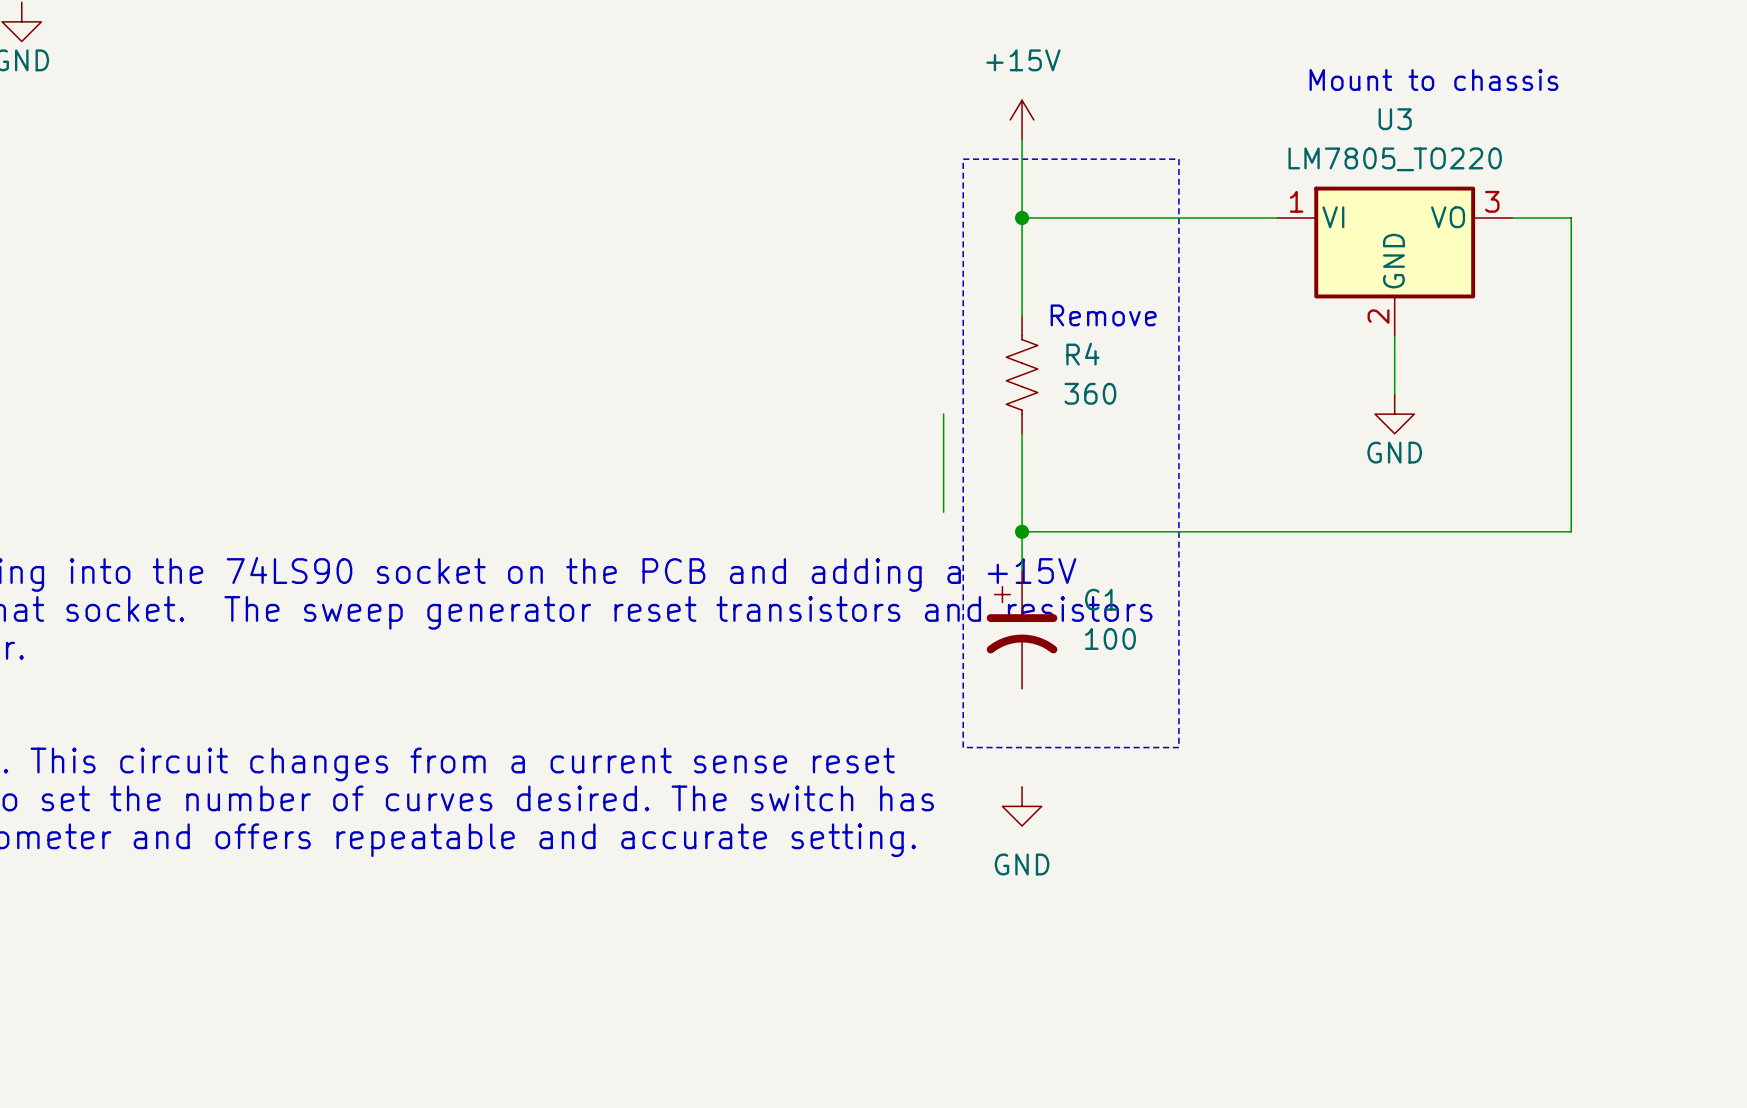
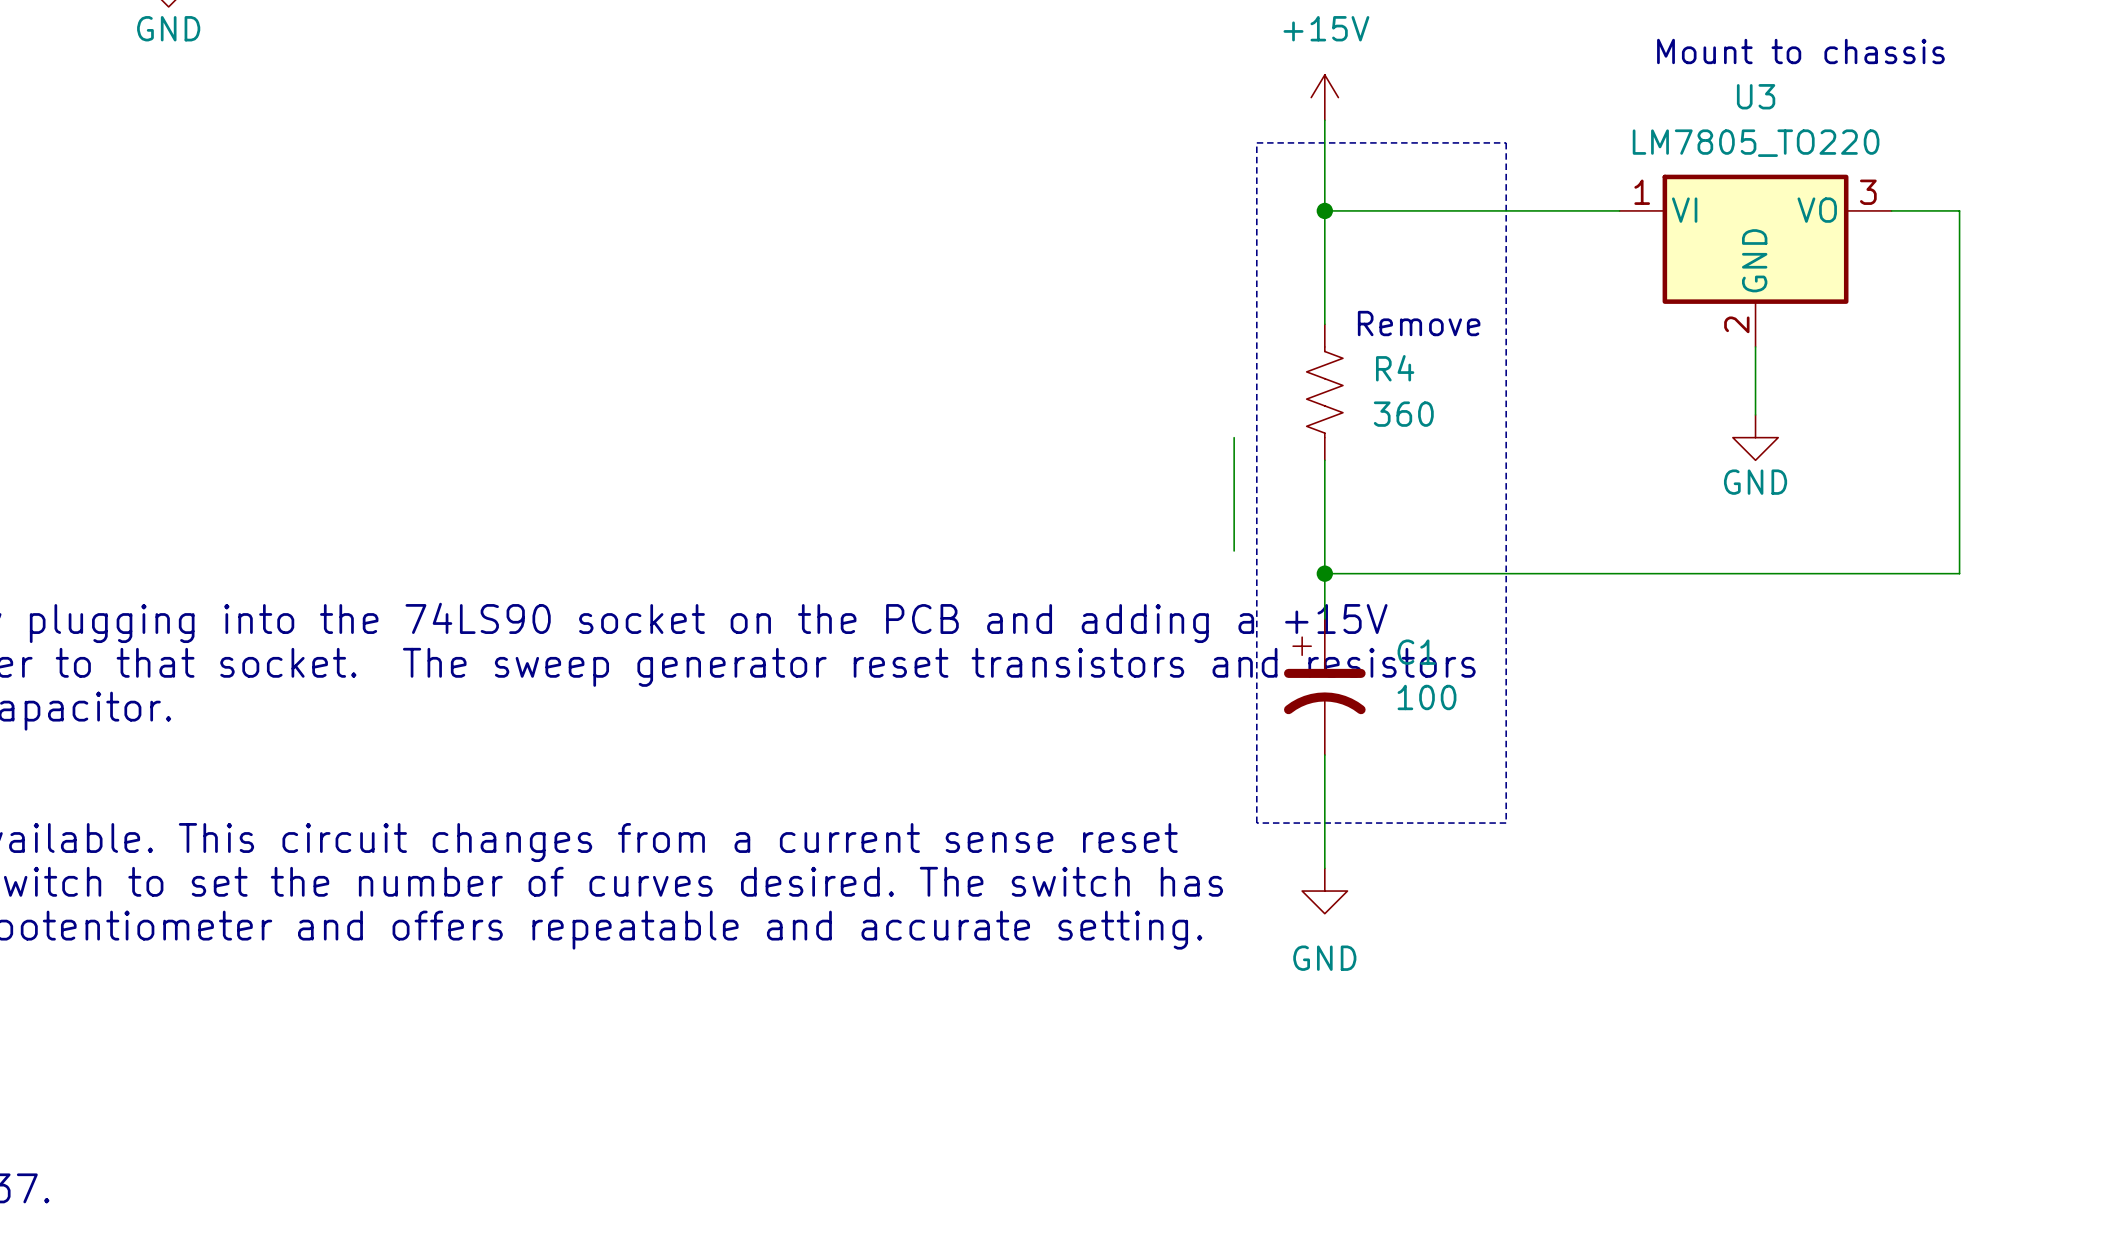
wire: none -> (1324, 755) (1324, 868)

